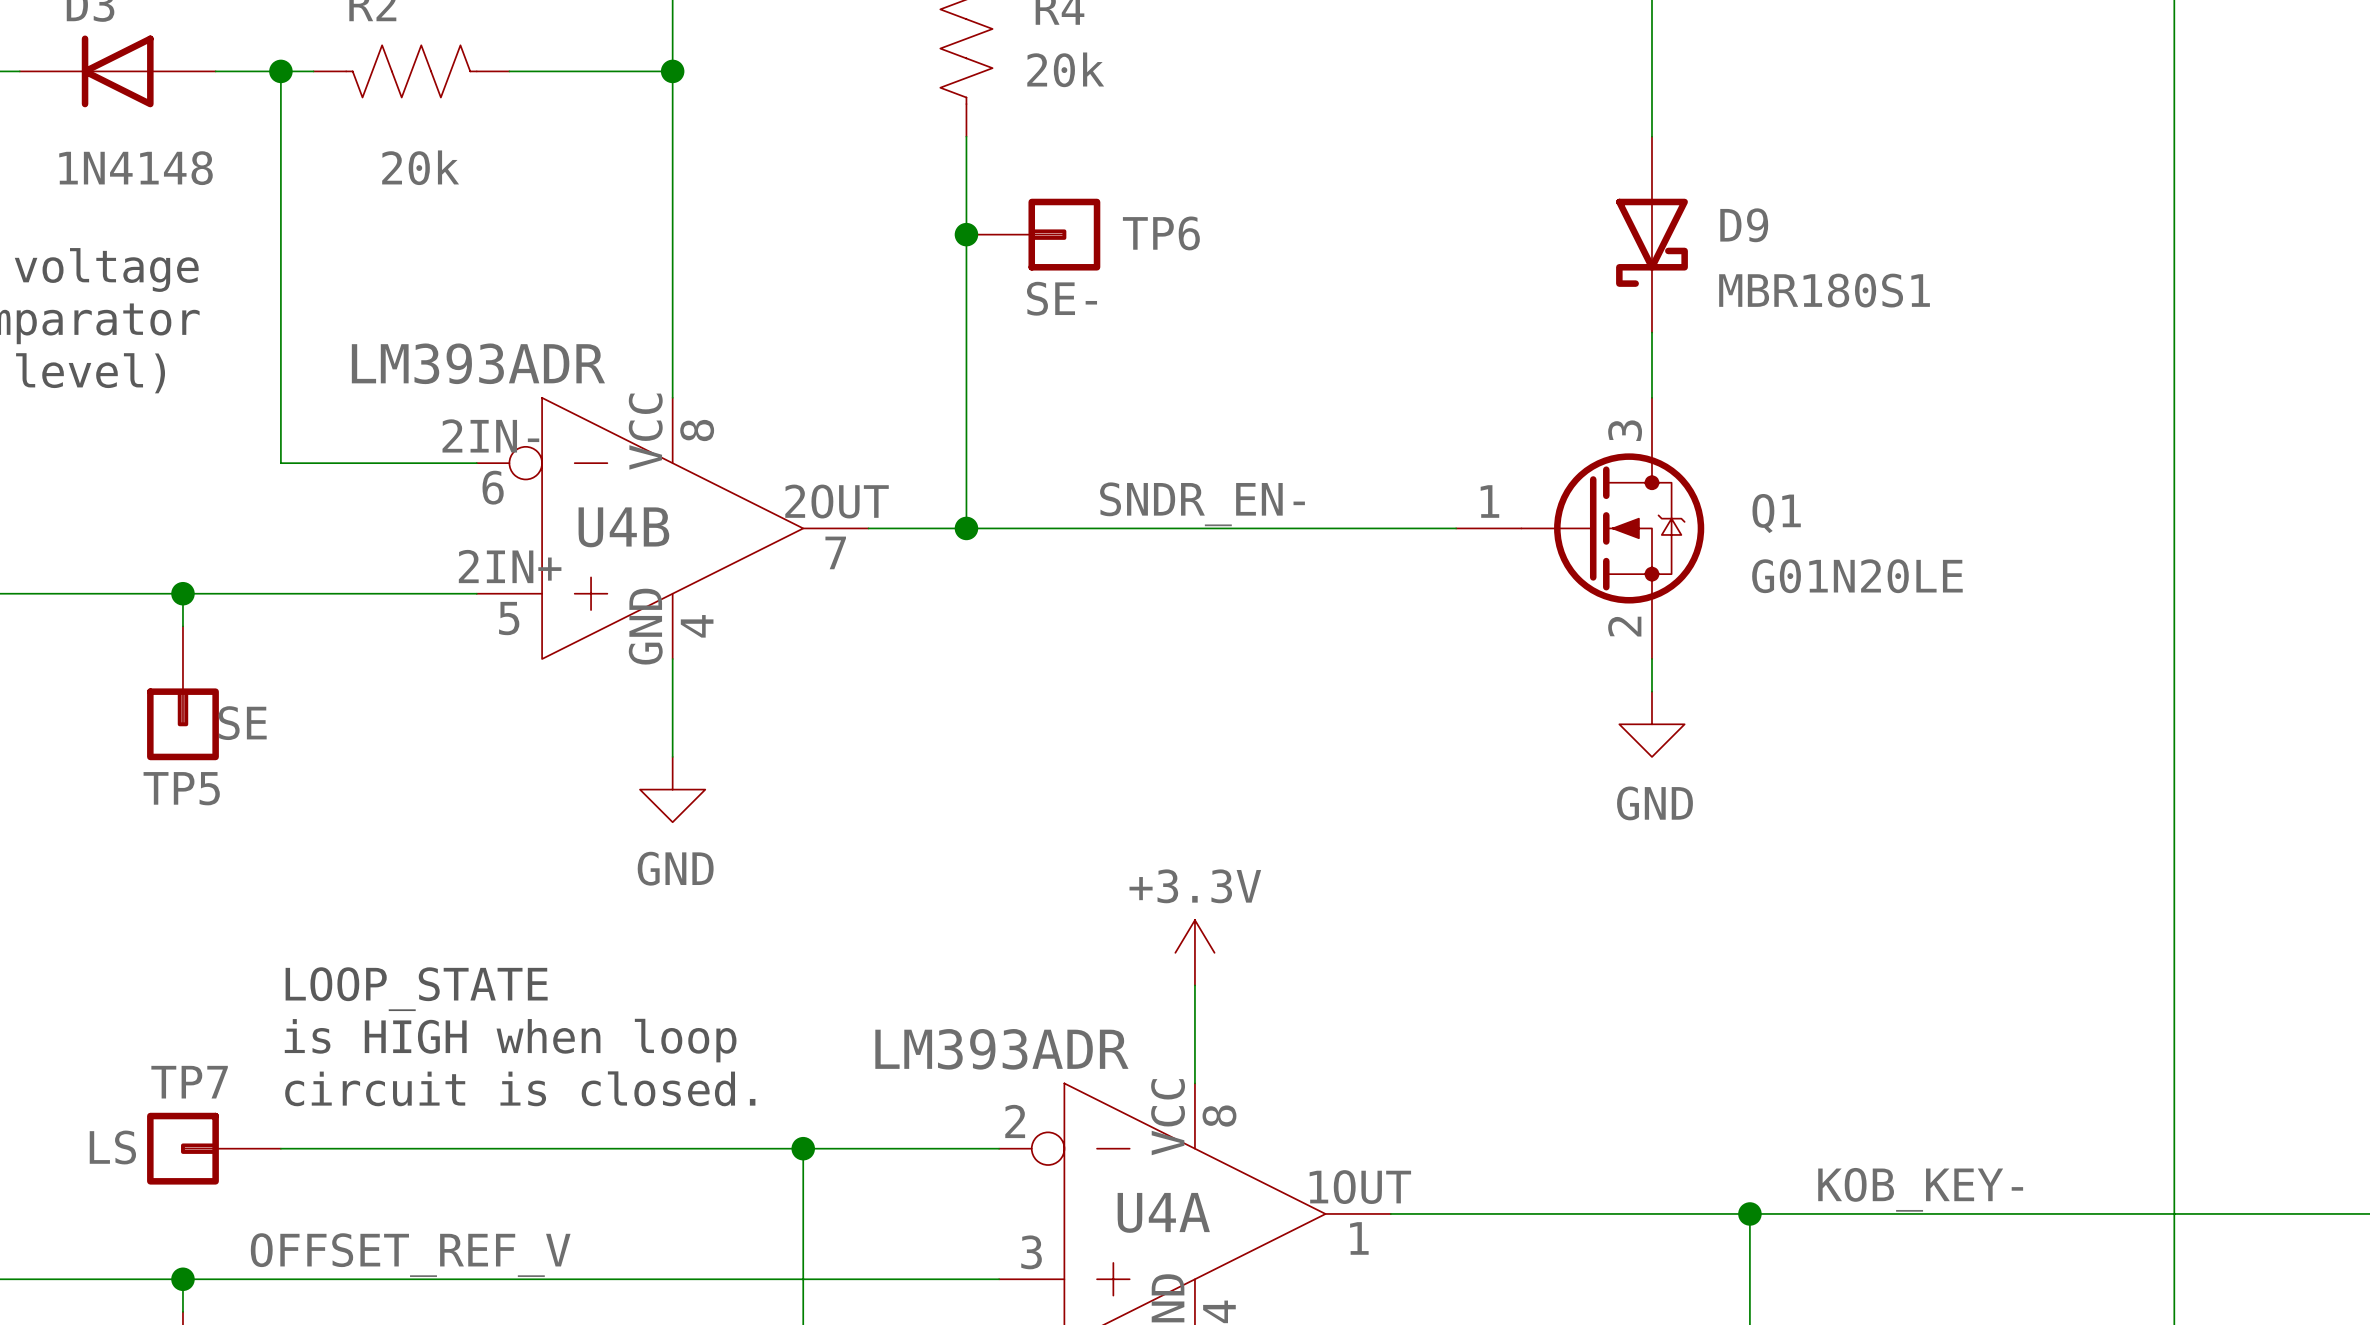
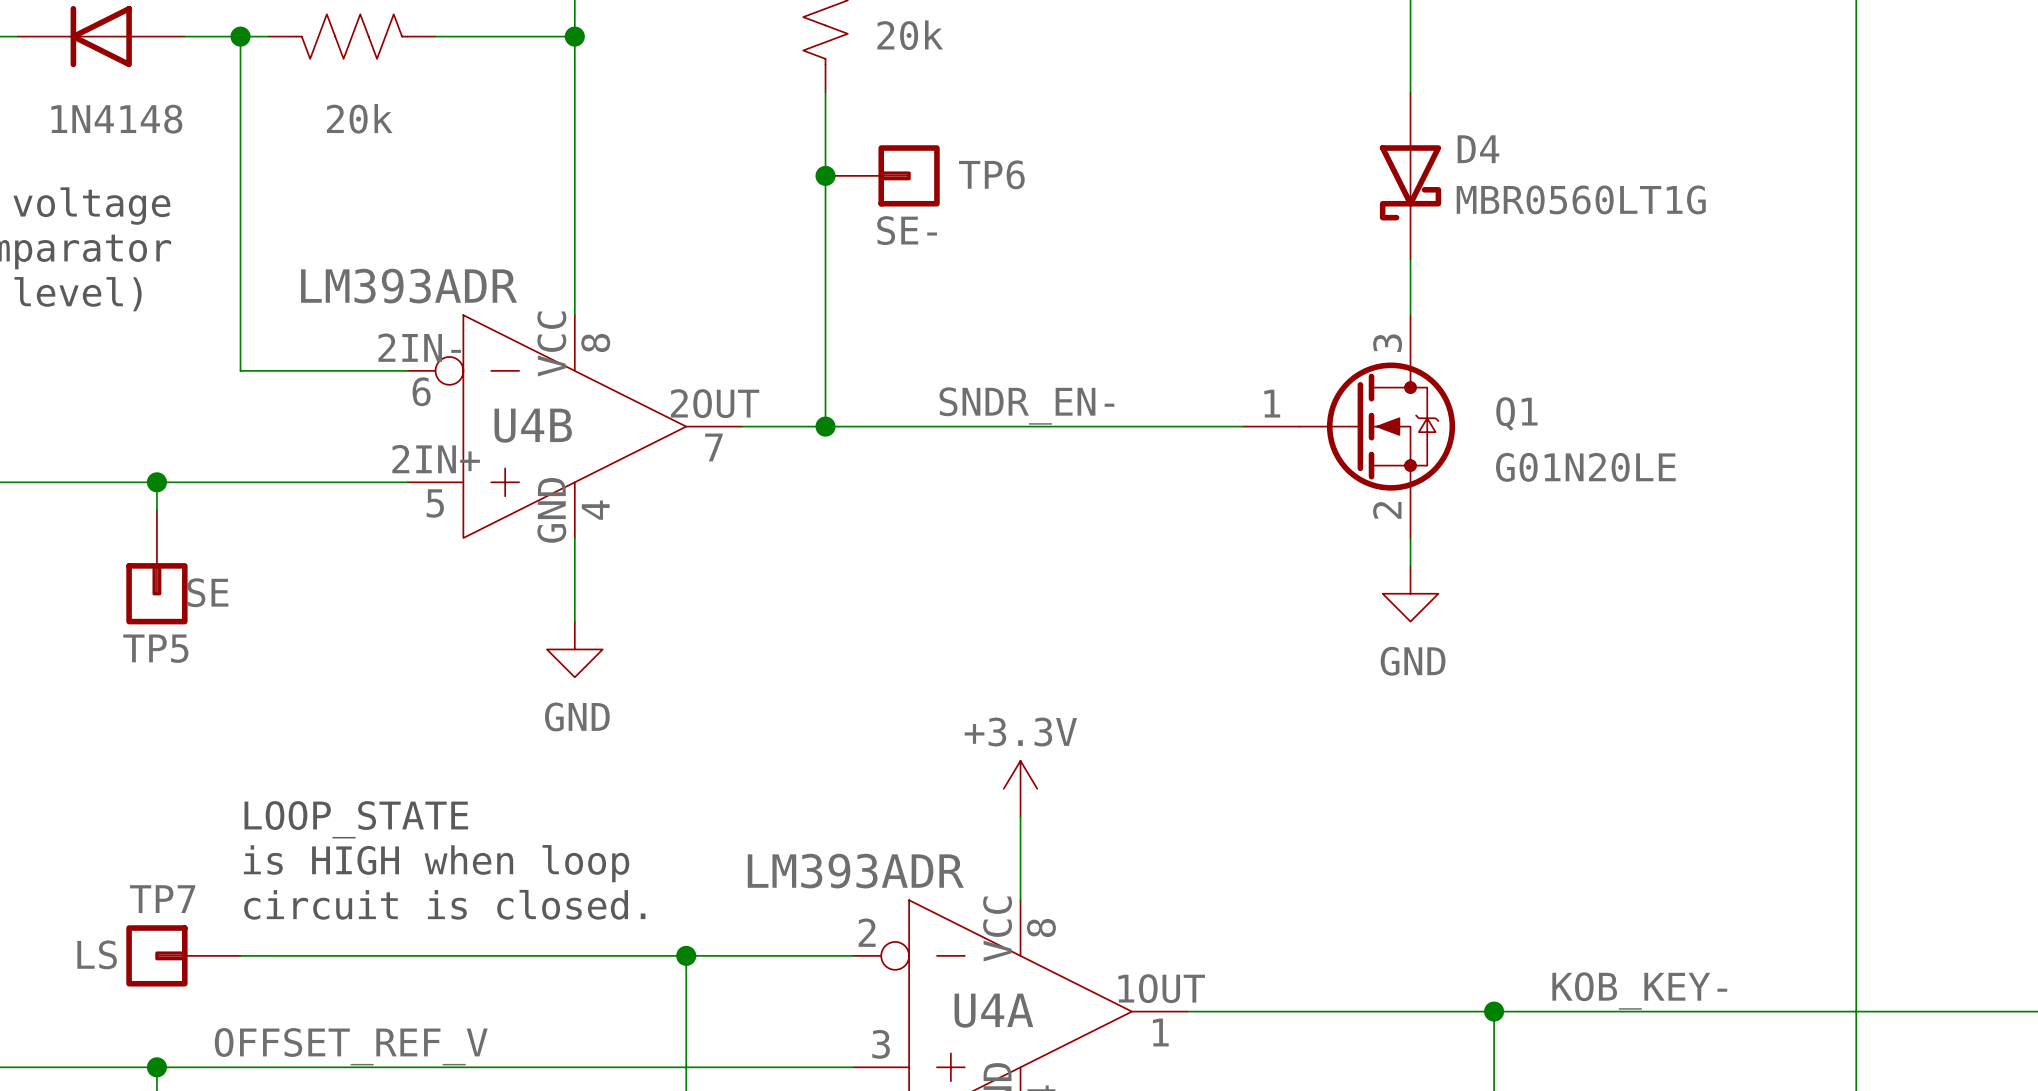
D9 name: D9 (1744, 225) -> D4 (1478, 149)
D9 value: MBR180S1 (1824, 290) -> MBR0560LT1G (1581, 199)

